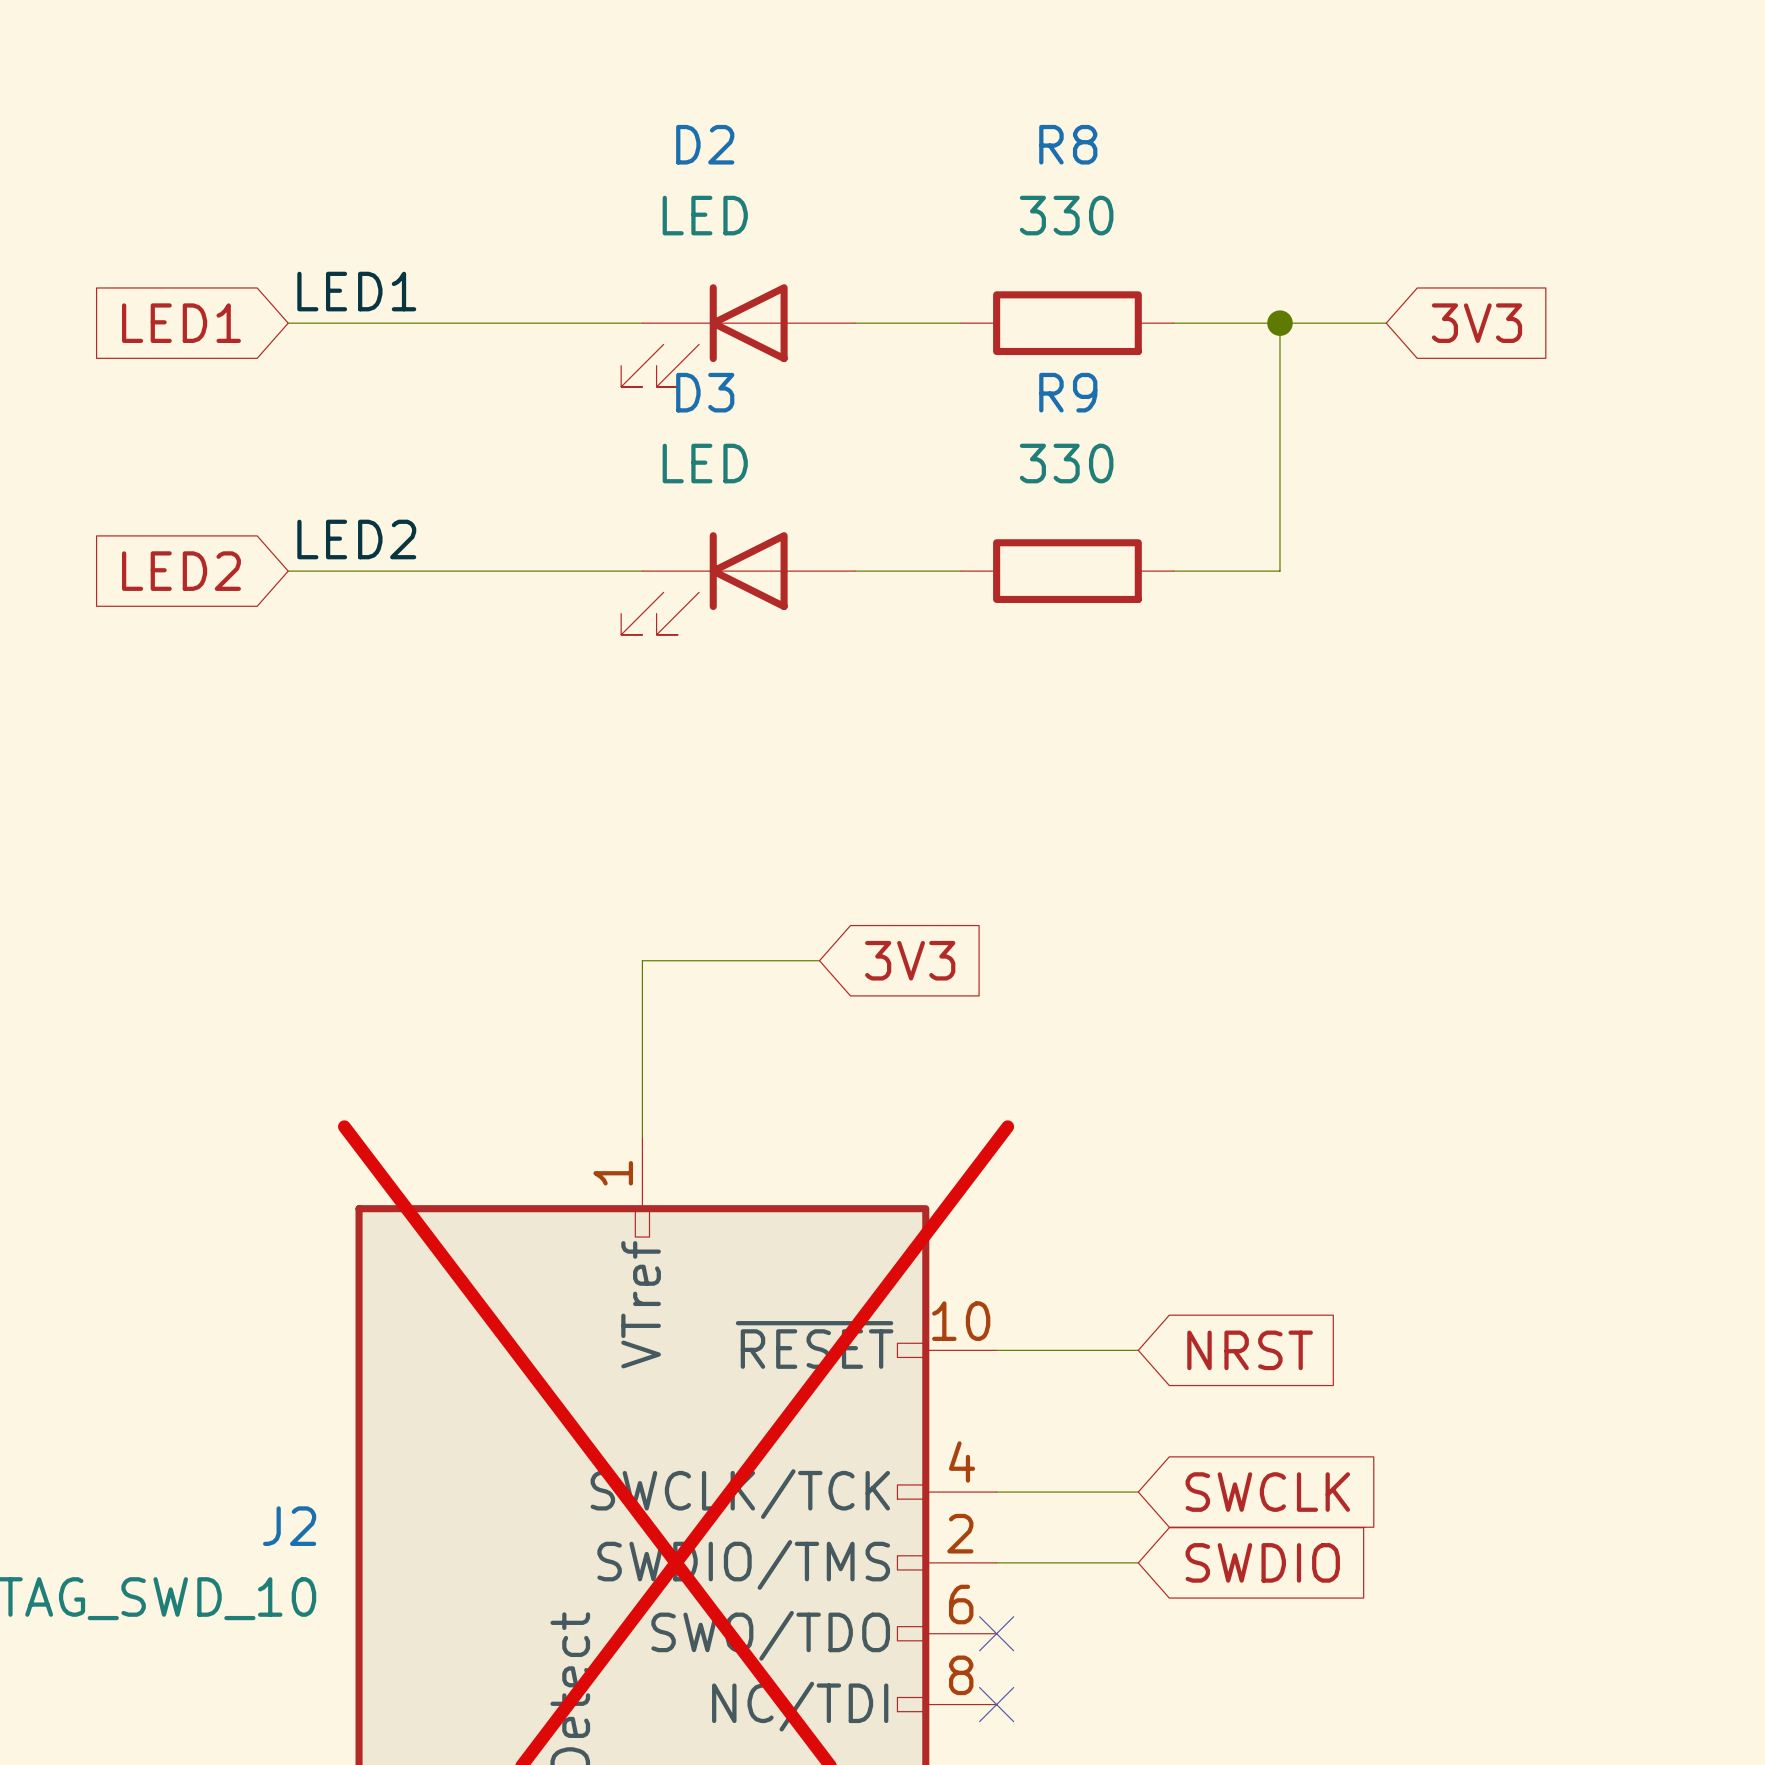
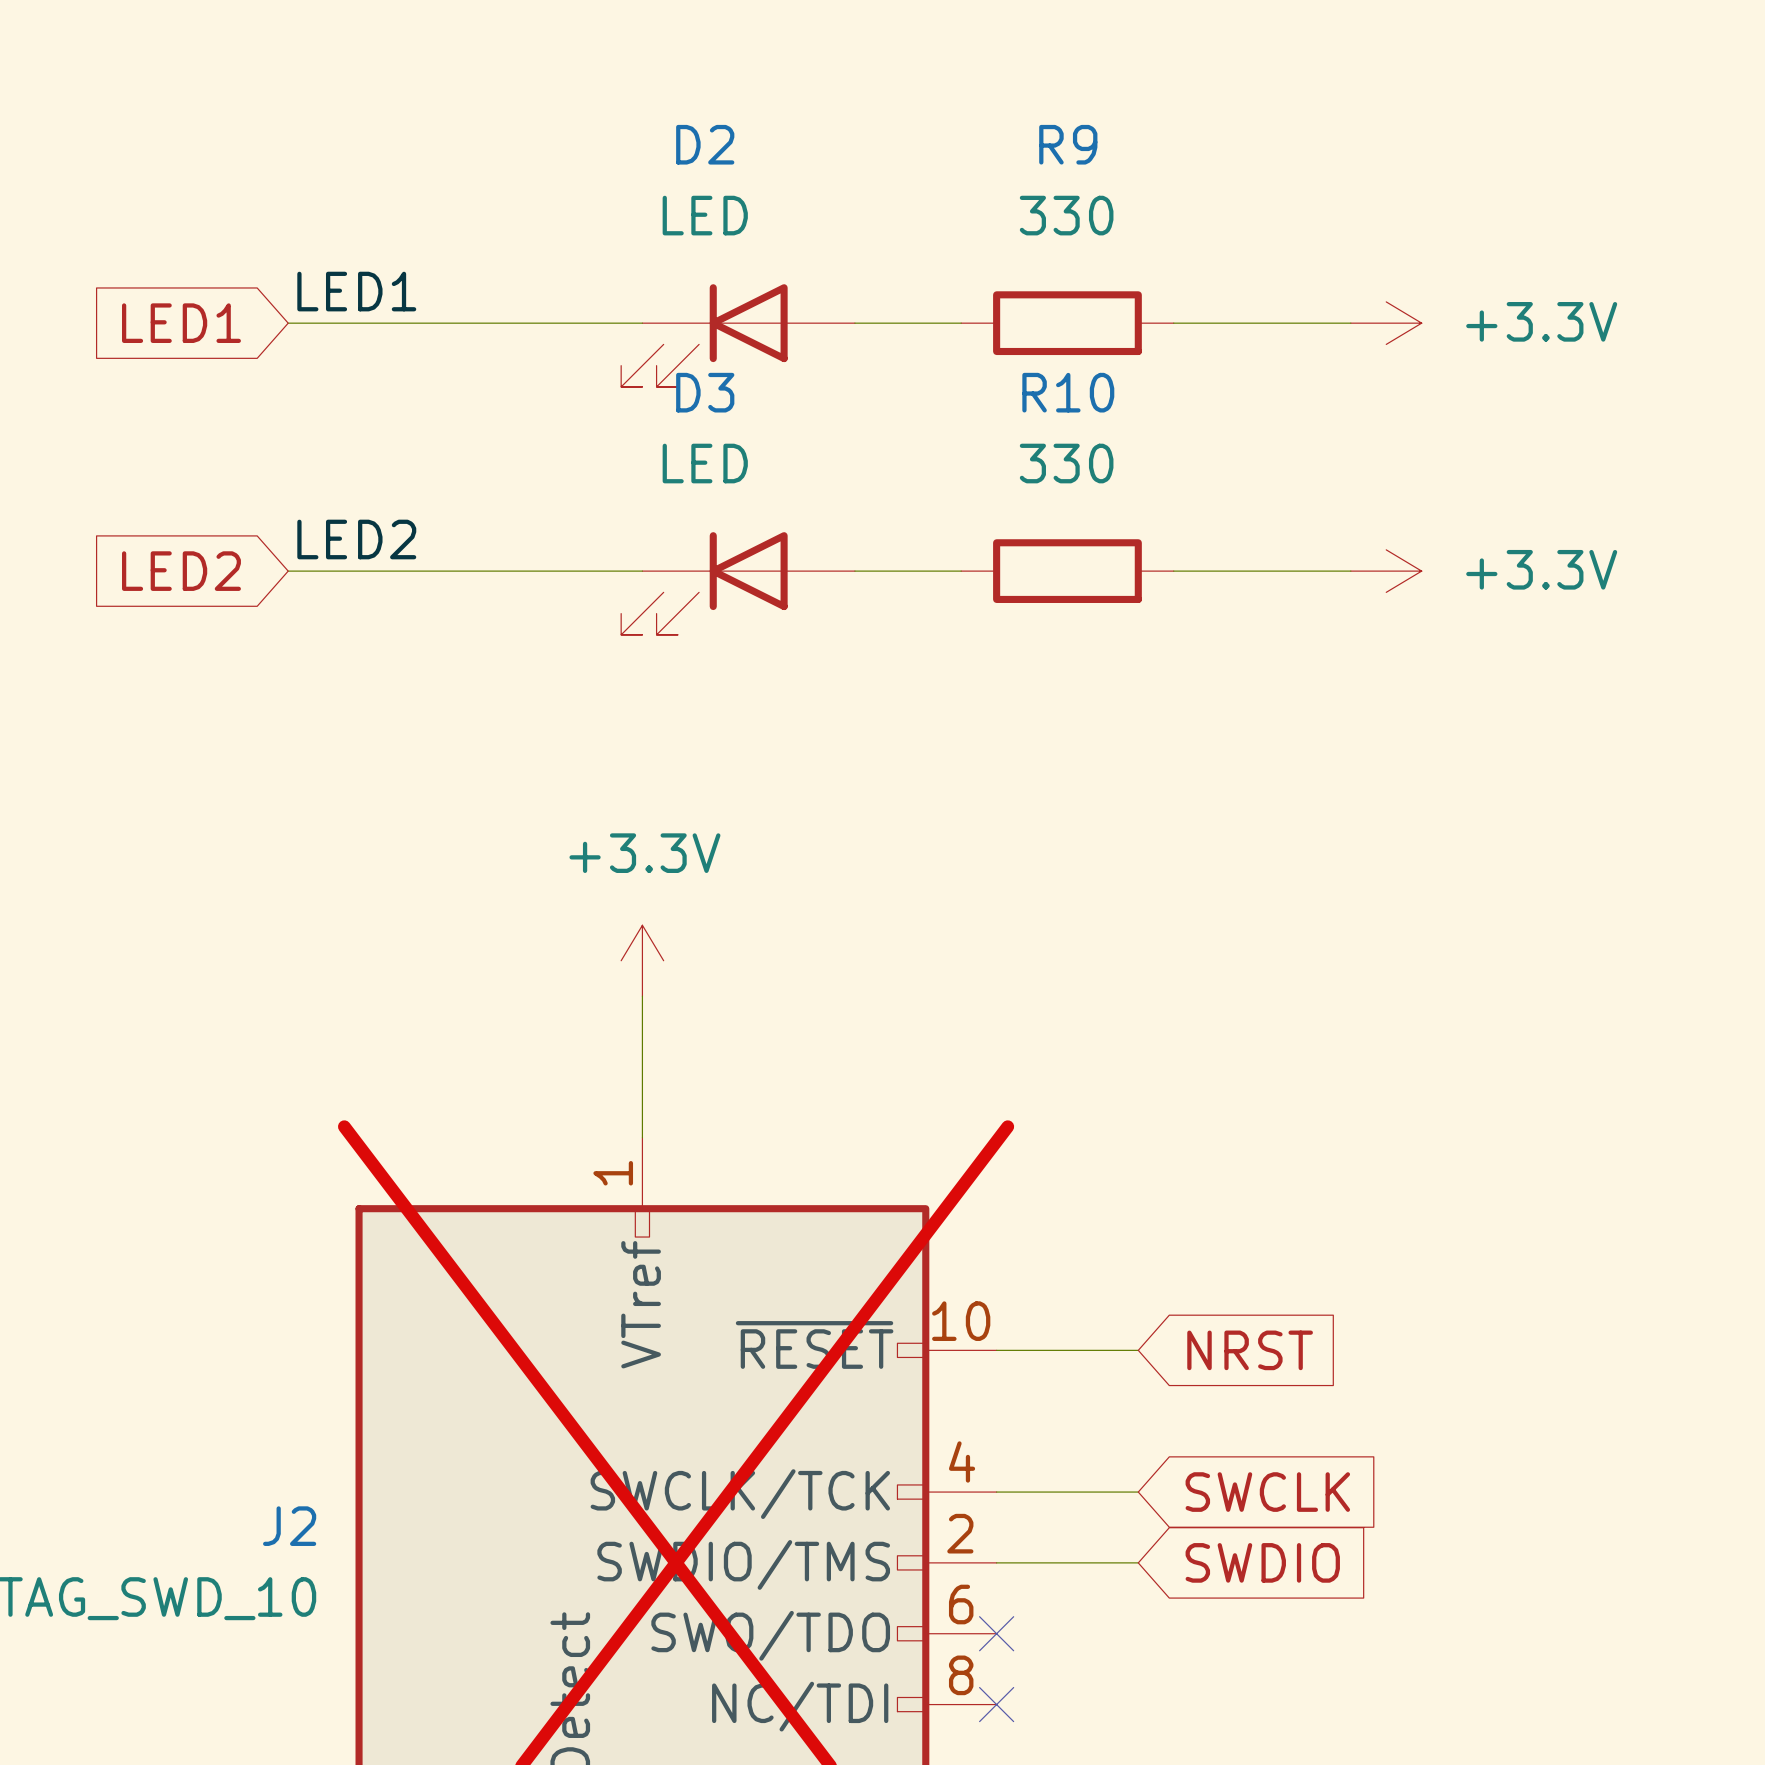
R8 name: R8 (1068, 144) -> R9 (1068, 144)
wire: (1279, 323) (1279, 571) -> (1350, 571) (1279, 571)
junction: (1279, 323) -> none
power symbol: none -> +3.3V (1386, 323)
global label: 3V3 (1476, 323) -> none
R9 name: R9 (1068, 392) -> R10 (1068, 392)
power symbol: none -> +3.3V (1386, 571)
power symbol: none -> +3.3V (642, 960)
wire: (819, 960) (642, 960) (642, 996) -> none
global label: 3V3 (910, 960) -> none

